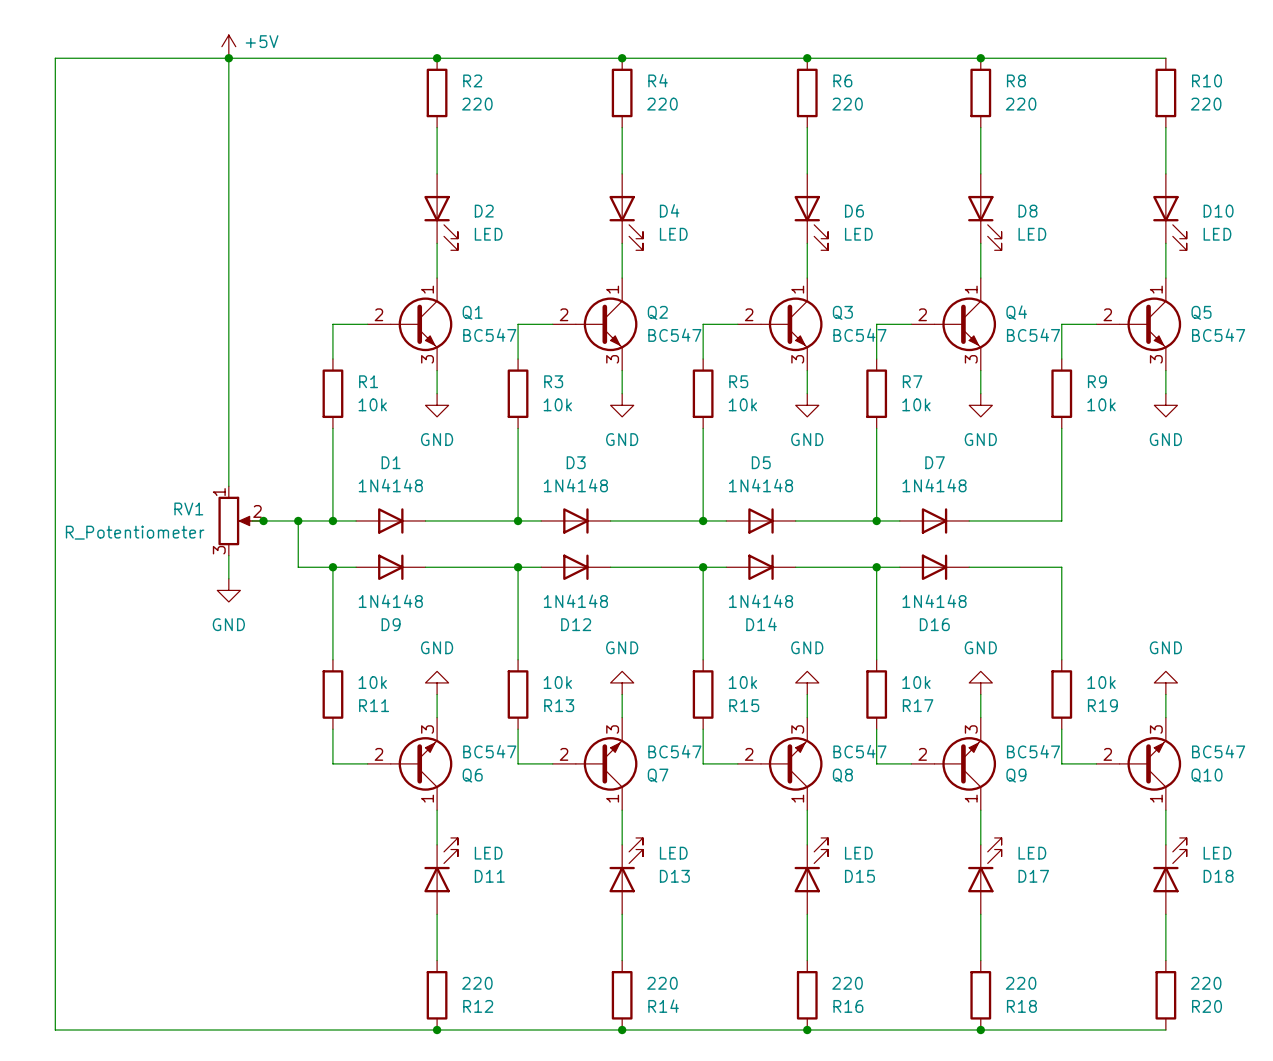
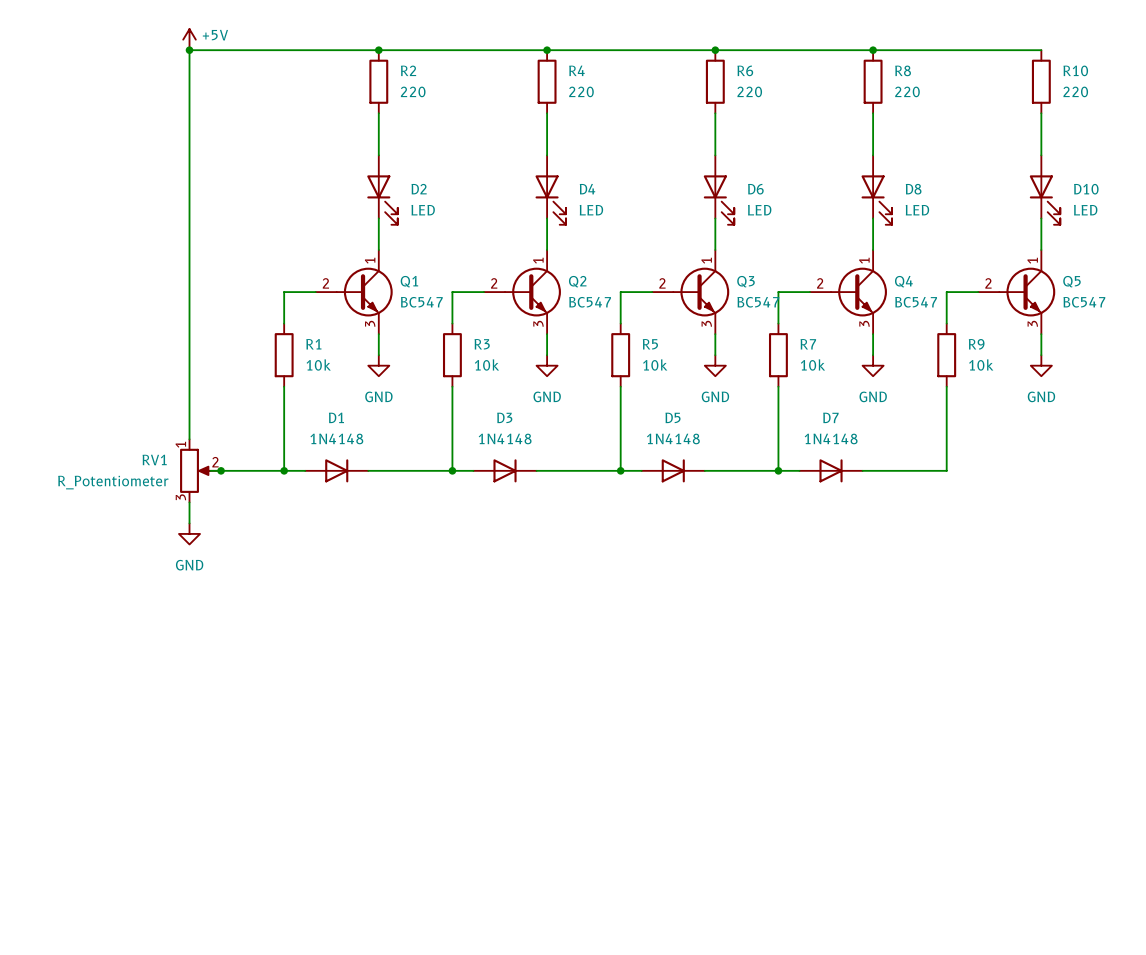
wire: (228, 58) (55, 58) (55, 1030) (1165, 1030) -> none
wire: (298, 520) (298, 567) (356, 567) -> none
junction: (298, 520) -> none
wire: (332, 567) (332, 659) -> none
junction: (332, 567) -> none
D9: 1N4148 (390, 567) -> none
wire: (425, 567) (541, 567) -> none
wire: (518, 567) (518, 659) -> none
junction: (518, 567) -> none
D12: 1N4148 (575, 567) -> none
wire: (610, 567) (726, 567) -> none
wire: (703, 567) (703, 659) -> none
junction: (703, 567) -> none
D14: 1N4148 (760, 567) -> none
wire: (795, 567) (899, 567) -> none
wire: (876, 567) (876, 659) -> none
junction: (876, 567) -> none
D16: 1N4148 (934, 567) -> none
wire: (969, 567) (1061, 567) (1061, 659) -> none
power symbol: GND (437, 682) -> none
power symbol: GND (622, 682) -> none
power symbol: GND (807, 682) -> none
power symbol: GND (980, 682) -> none
power symbol: GND (1165, 682) -> none
R11: 10k (332, 694) -> none
wire: (437, 694) (437, 717) -> none
R13: 10k (518, 694) -> none
wire: (622, 694) (622, 717) -> none
R15: 10k (703, 694) -> none
wire: (807, 694) (807, 717) -> none
R17: 10k (876, 694) -> none
wire: (980, 694) (980, 717) -> none
R19: 10k (1061, 694) -> none
wire: (1165, 694) (1165, 717) -> none
wire: (332, 729) (332, 763) (367, 763) -> none
wire: (518, 729) (518, 763) (552, 763) -> none
wire: (703, 729) (703, 763) (737, 763) -> none
wire: (876, 729) (876, 763) (911, 763) -> none
wire: (1061, 729) (1061, 763) (1096, 763) -> none
Q6: BC547 (410, 763) -> none
Q7: BC547 (595, 763) -> none
Q8: BC547 (780, 763) -> none
Q9: BC547 (953, 763) -> none
Q10: BC547 (1138, 763) -> none
wire: (437, 810) (437, 844) -> none
wire: (622, 810) (622, 844) -> none
wire: (807, 810) (807, 844) -> none
wire: (980, 810) (980, 844) -> none
wire: (1165, 810) (1165, 844) -> none
D11: LED (441, 876) -> none
D13: LED (626, 876) -> none
D15: LED (811, 876) -> none
D17: LED (984, 876) -> none
D18: LED (1169, 876) -> none
wire: (437, 914) (437, 960) -> none
wire: (622, 914) (622, 960) -> none
wire: (807, 914) (807, 960) -> none
wire: (980, 914) (980, 960) -> none
wire: (1165, 914) (1165, 960) -> none
R12: 220 (437, 995) -> none
R14: 220 (622, 995) -> none
R16: 220 (807, 995) -> none
R18: 220 (980, 995) -> none
R20: 220 (1165, 995) -> none
junction: (437, 1030) -> none
junction: (622, 1030) -> none
junction: (807, 1030) -> none
junction: (980, 1030) -> none

